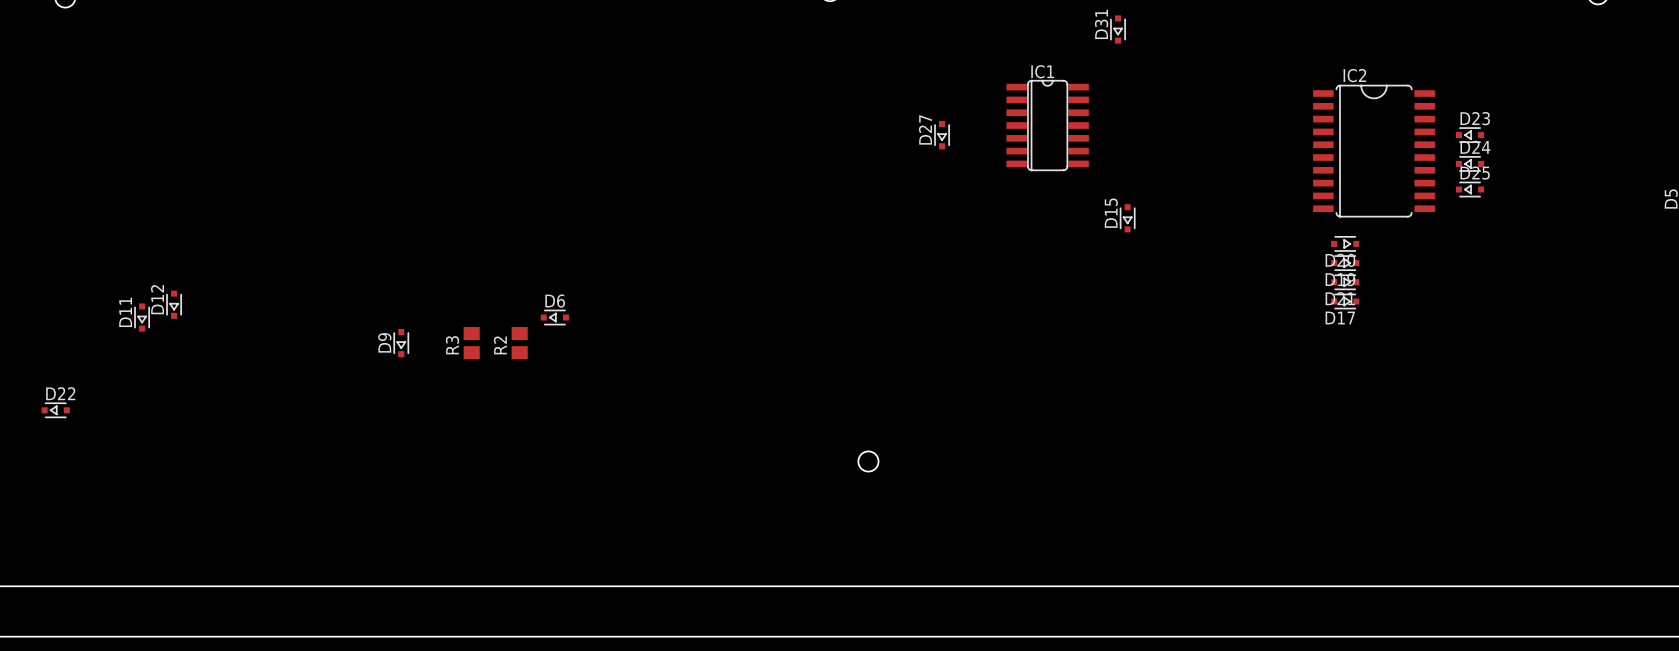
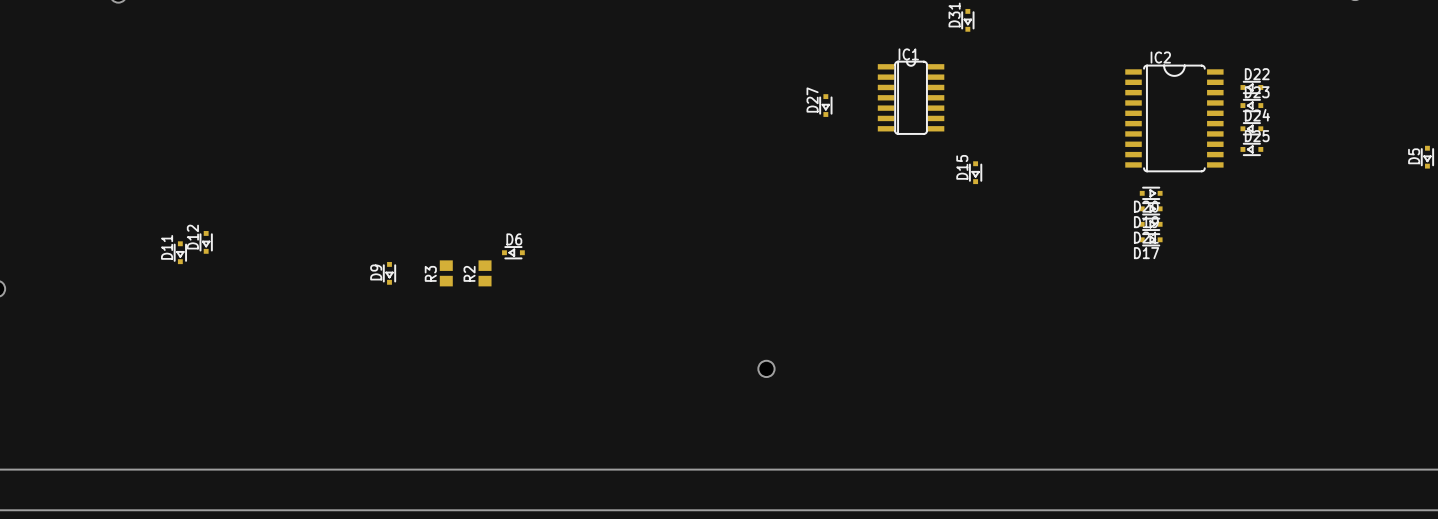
D22 position: (55, 410) -> (1251, 87)

